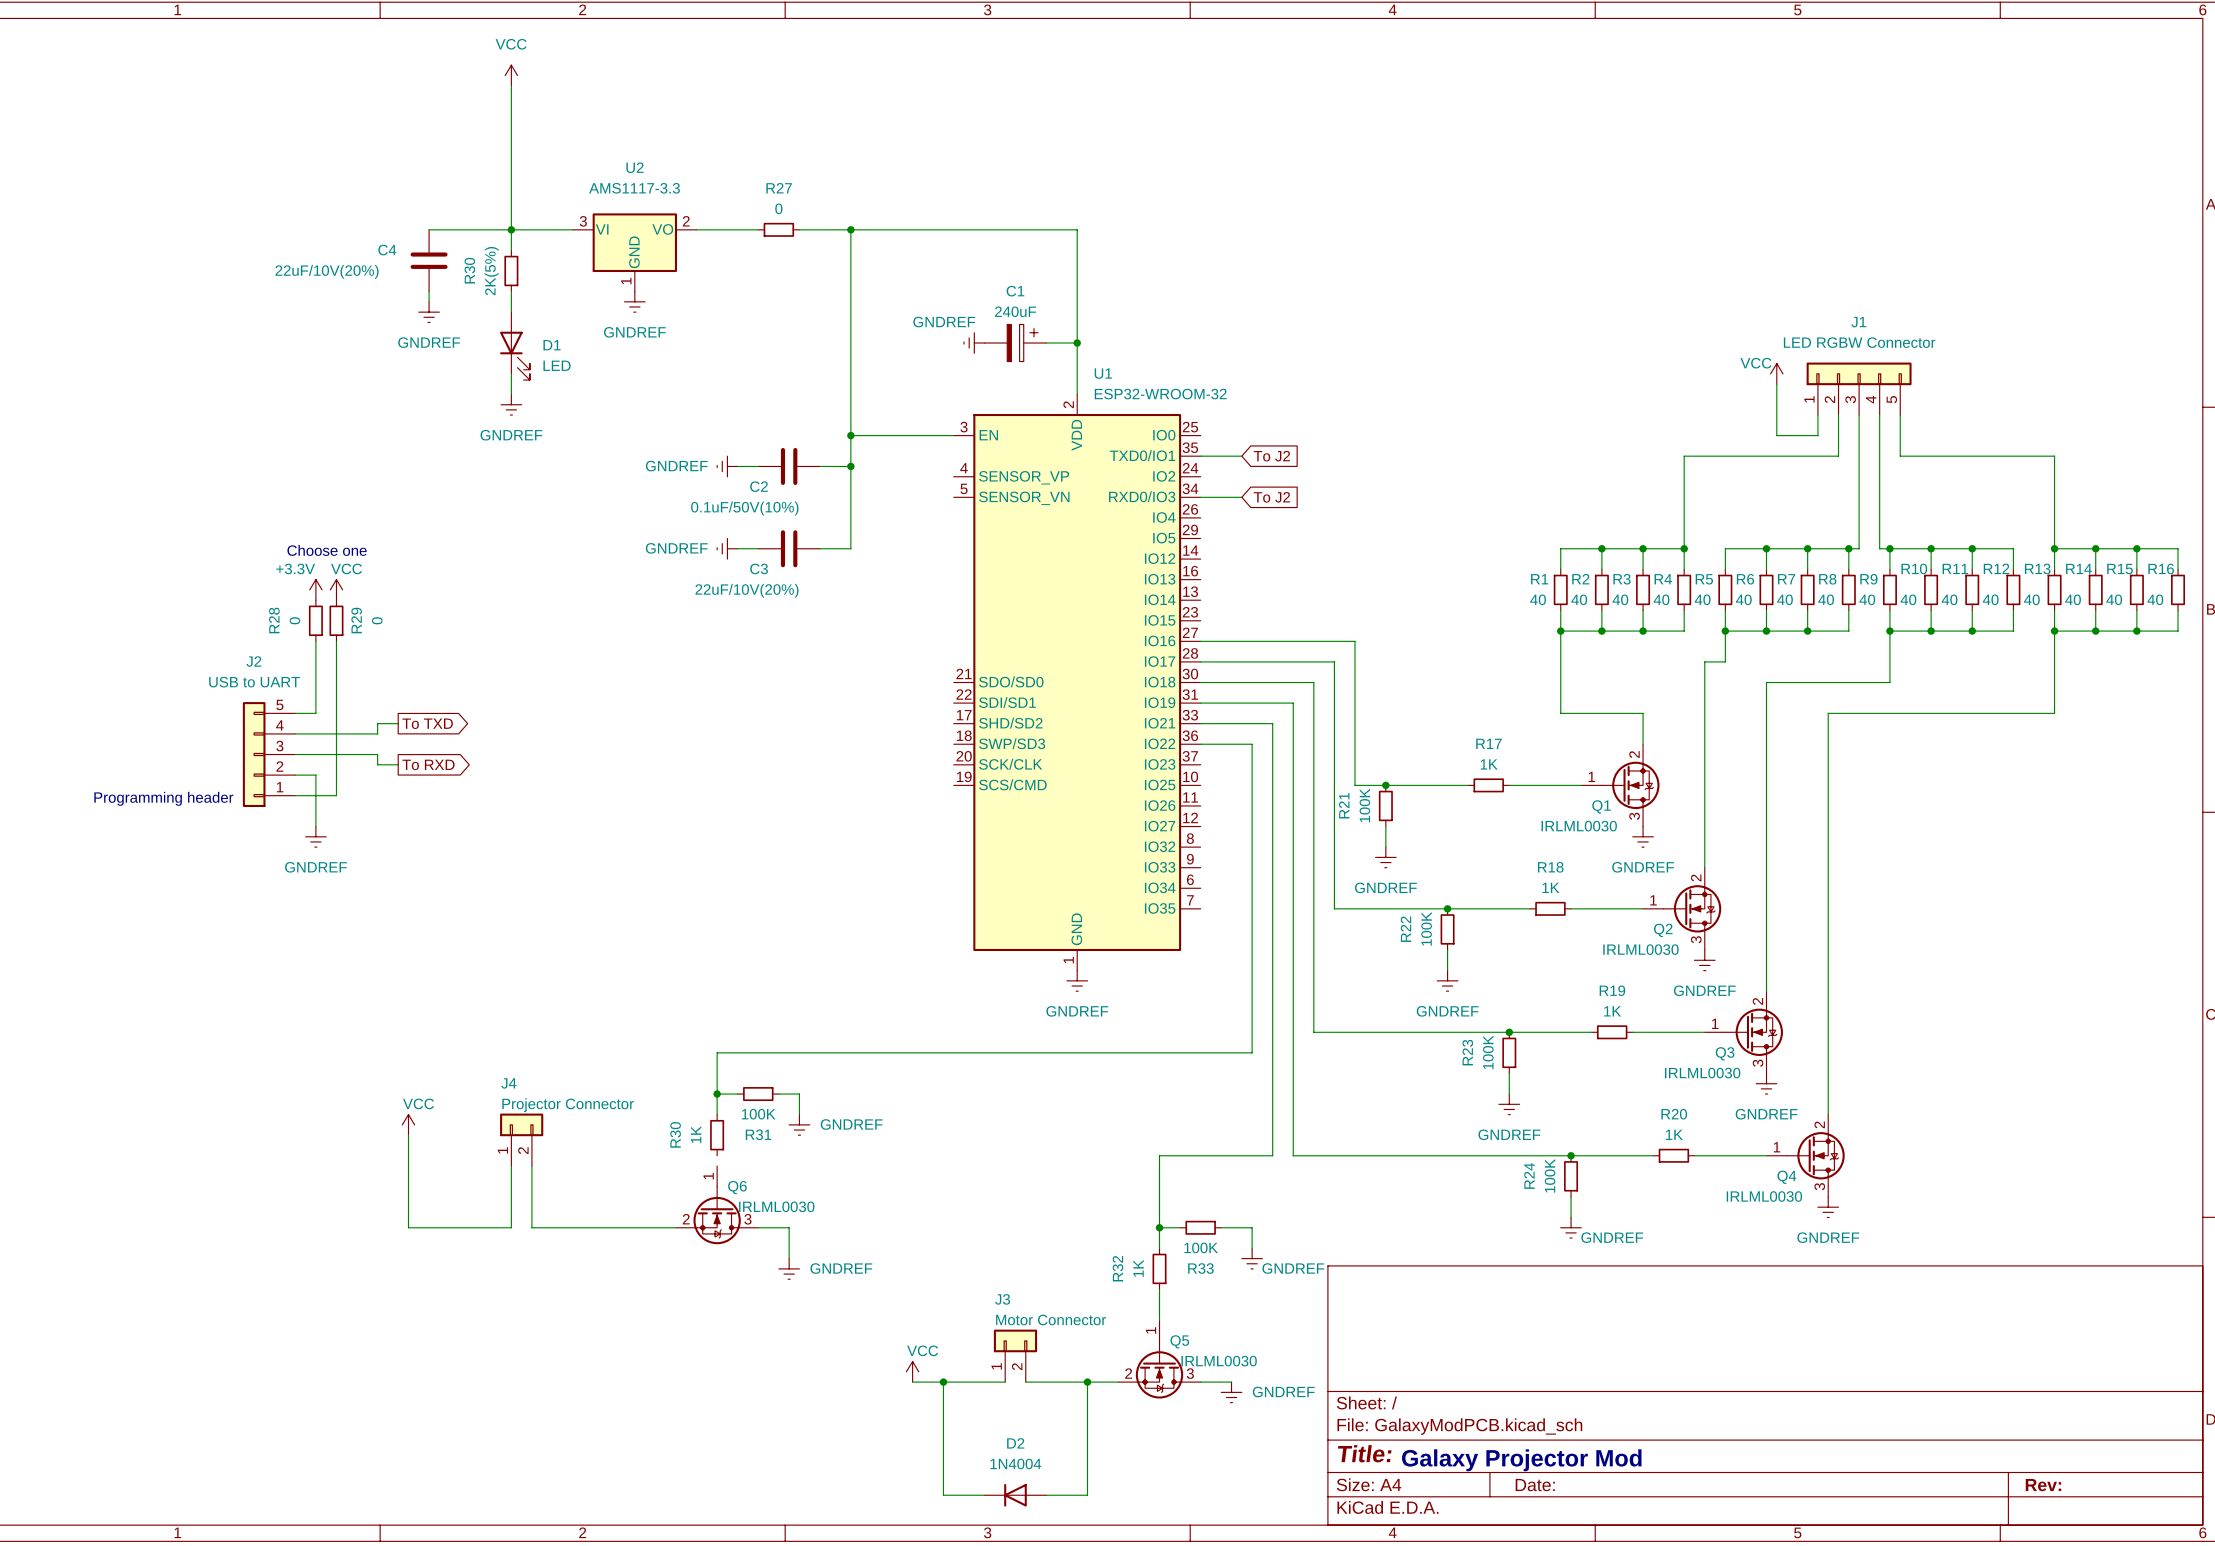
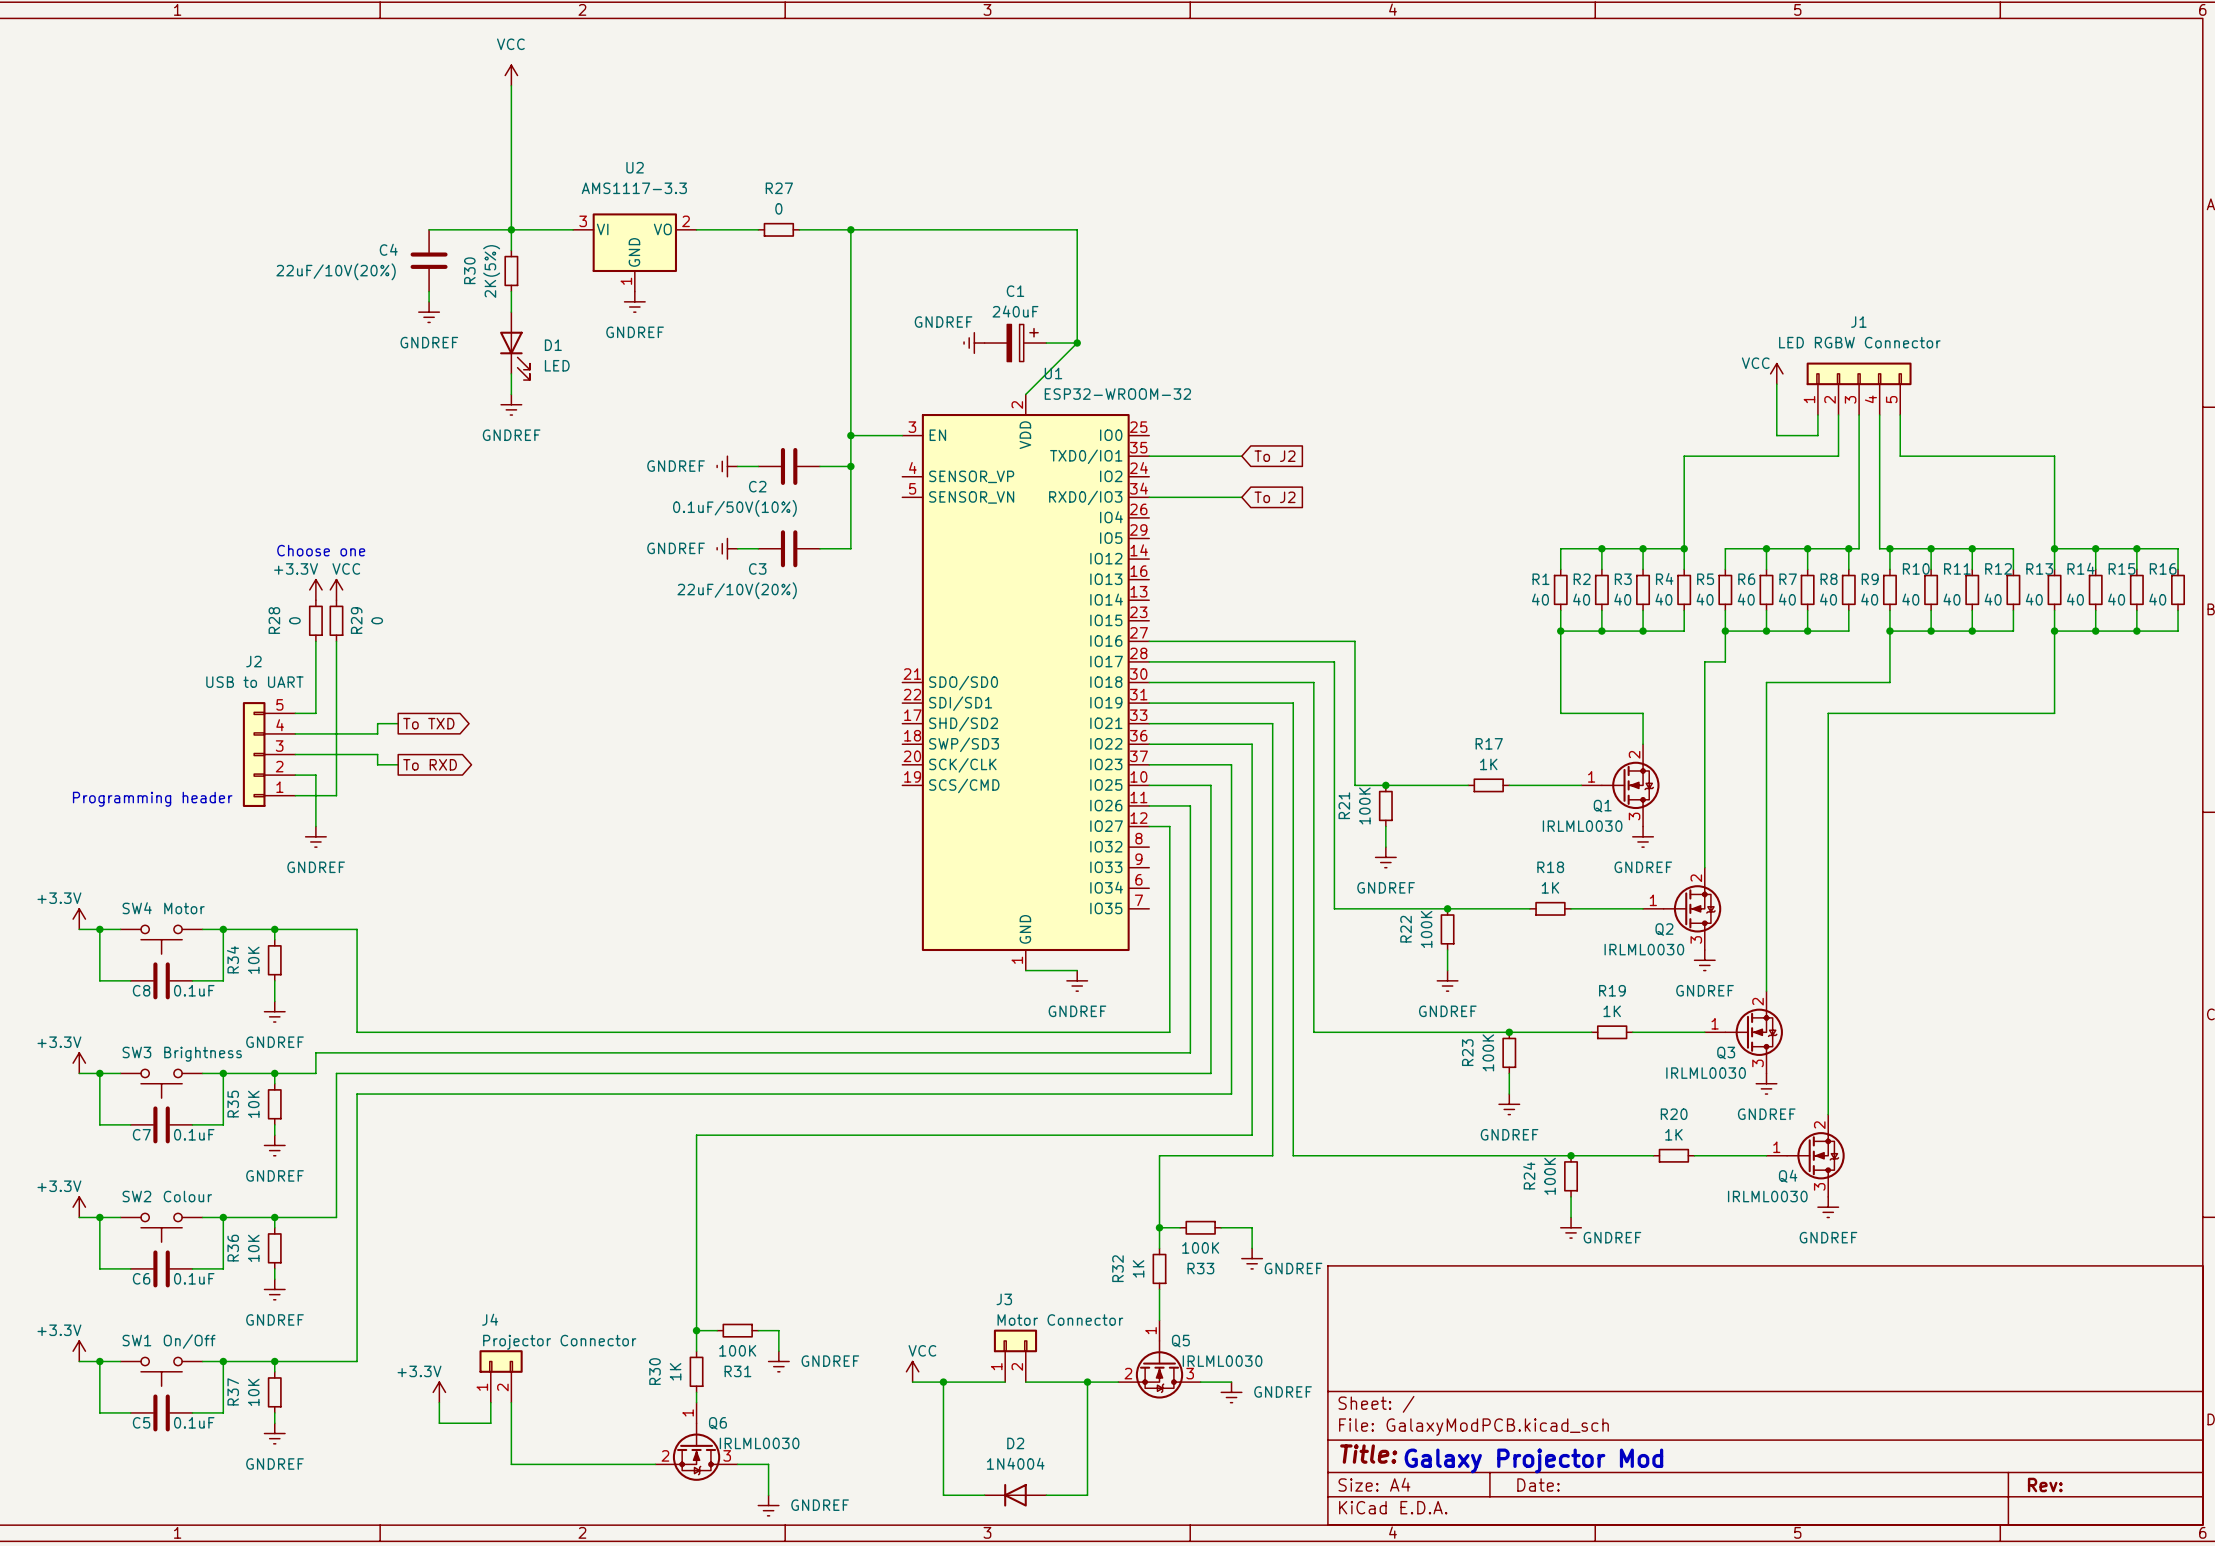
wire: (1077, 343) (1077, 394) -> (1077, 343) (1025, 394)
U1 position: (1077, 682) -> (1025, 682)
wire: none -> (1149, 785) (1210, 785) (1210, 1073) (336, 1073) (336, 1217) (202, 1217)
wire: none -> (1149, 826) (1169, 826) (1169, 1032) (357, 1032) (357, 929) (202, 929)
power symbol: none -> +3.3V (79, 919)
wire: none -> (79, 929) (120, 929)
wire: none -> (99, 929) (99, 980) (130, 980)
junction: none -> (99, 929)
wire: none -> (223, 929) (223, 980) (192, 980)
junction: none -> (223, 929)
wire: none -> (274, 929) (274, 939)
junction: none -> (274, 929)
SW4: none -> Motor (161, 939)
R34: none -> 10K (274, 960)
wire: none -> (1025, 970) (1077, 970)
C8: none -> 0.1uF (161, 980)
wire: none -> (274, 980) (274, 1001)
power symbol: none -> GNDREF (274, 1011)
wire: (717, 1052) (717, 1114) -> (717, 1052) (315, 1052) (315, 1073) (202, 1073)
wire: (1190, 1052) (1252, 1052) -> (1190, 1052) (1190, 805) (1149, 805)
wire: none -> (1252, 1052) (1252, 1135) (696, 1135) (696, 1351)
power symbol: none -> +3.3V (79, 1063)
wire: none -> (79, 1073) (120, 1073)
wire: none -> (99, 1073) (99, 1124) (130, 1124)
junction: none -> (99, 1073)
wire: none -> (223, 1073) (223, 1124) (192, 1124)
junction: none -> (223, 1073)
wire: none -> (274, 1073) (274, 1083)
junction: none -> (274, 1073)
SW3: none -> Brightness (161, 1083)
wire: none -> (717, 1094) (357, 1094) (357, 1361) (202, 1361)
junction: (717, 1094) -> none
wire: none -> (737, 1094) (778, 1094)
R31 position: (758, 1094) -> (737, 1330)
wire: (799, 1094) (799, 1114) -> (799, 1094) (1231, 1094) (1231, 764) (1149, 764)
R35: none -> 10K (274, 1104)
C7: none -> 0.1uF (161, 1124)
wire: none -> (274, 1124) (274, 1135)
power symbol: VCC (408, 1124) -> none
power symbol: GNDREF (799, 1124) -> none
wire: (408, 1135) (408, 1227) (511, 1227) (511, 1166) -> none
R30: 1K (717, 1135) -> none
J4 position: (521, 1139) -> (501, 1376)
power symbol: none -> GNDREF (274, 1145)
wire: (531, 1166) (531, 1227) (675, 1227) -> none
Q6 position: (717, 1205) -> (696, 1441)
power symbol: none -> +3.3V (79, 1207)
wire: none -> (79, 1217) (120, 1217)
wire: none -> (99, 1217) (99, 1268) (130, 1268)
junction: none -> (99, 1217)
wire: none -> (223, 1217) (223, 1268) (192, 1268)
junction: none -> (223, 1217)
wire: none -> (274, 1217) (274, 1227)
junction: none -> (274, 1217)
SW2: none -> Colour (161, 1227)
wire: (758, 1227) (789, 1227) (789, 1258) -> none
R36: none -> 10K (274, 1248)
C6: none -> 0.1uF (161, 1268)
wire: none -> (274, 1268) (274, 1279)
power symbol position: GNDREF (789, 1268) -> GNDREF (778, 1361)
power symbol: none -> GNDREF (274, 1289)
wire: none -> (696, 1330) (717, 1330)
junction: none -> (696, 1330)
wire: none -> (758, 1330) (778, 1330) (778, 1351)
power symbol: none -> +3.3V (79, 1351)
wire: none -> (79, 1361) (120, 1361)
wire: none -> (99, 1361) (99, 1412) (130, 1412)
junction: none -> (99, 1361)
wire: none -> (223, 1361) (223, 1412) (192, 1412)
junction: none -> (223, 1361)
wire: none -> (274, 1361) (274, 1371)
junction: none -> (274, 1361)
SW1: none -> On/Off (161, 1371)
R30: none -> 1K (696, 1371)
R37: none -> 10K (274, 1392)
power symbol: none -> +3.3V (439, 1392)
wire: none -> (696, 1392) (696, 1402)
wire: none -> (439, 1402) (439, 1423) (490, 1423) (490, 1402)
wire: none -> (511, 1402) (511, 1464) (655, 1464)
C5: none -> 0.1uF (161, 1412)
wire: none -> (274, 1412) (274, 1423)
power symbol: none -> GNDREF (274, 1433)
wire: none -> (737, 1464) (768, 1464) (768, 1495)
power symbol: none -> GNDREF (768, 1505)

